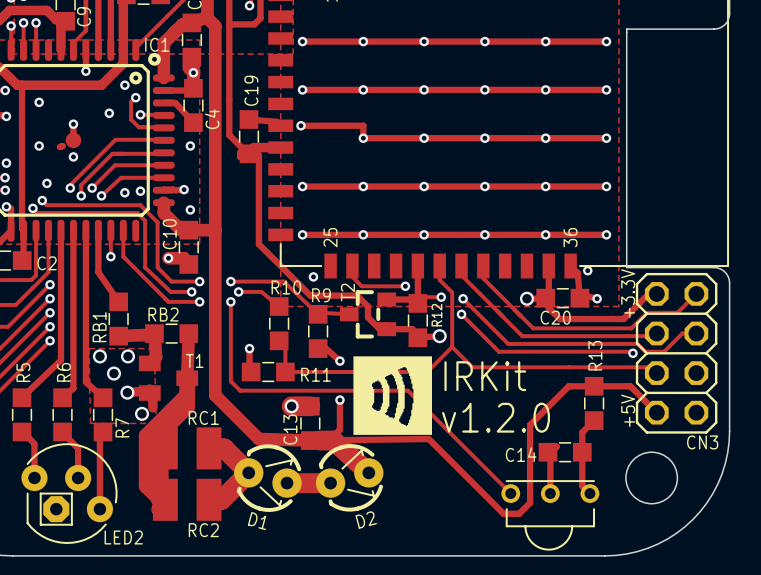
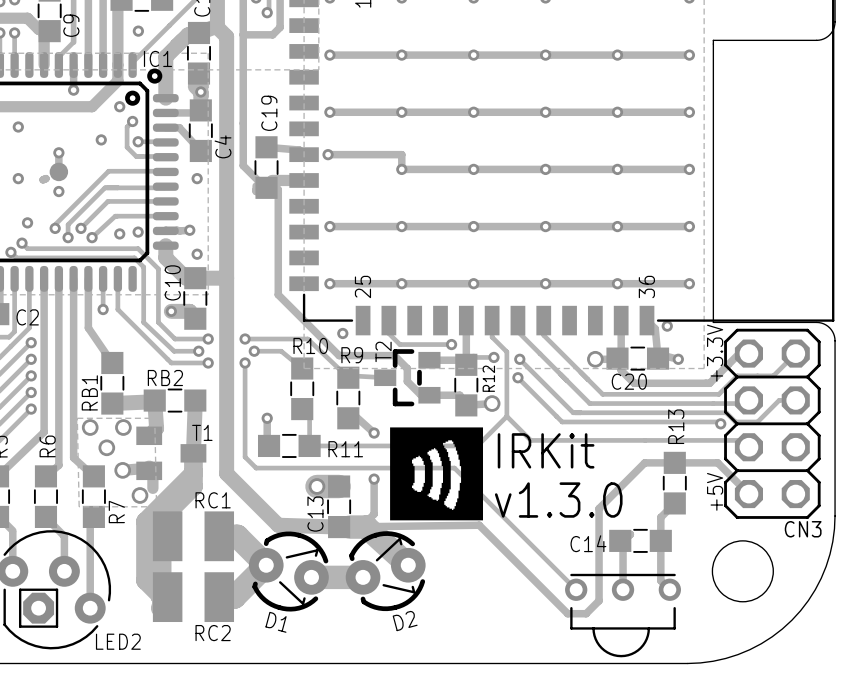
via: none -> (138, 31)
text: v1.2.0 (496, 417) -> v1.3.0 (558, 500)

